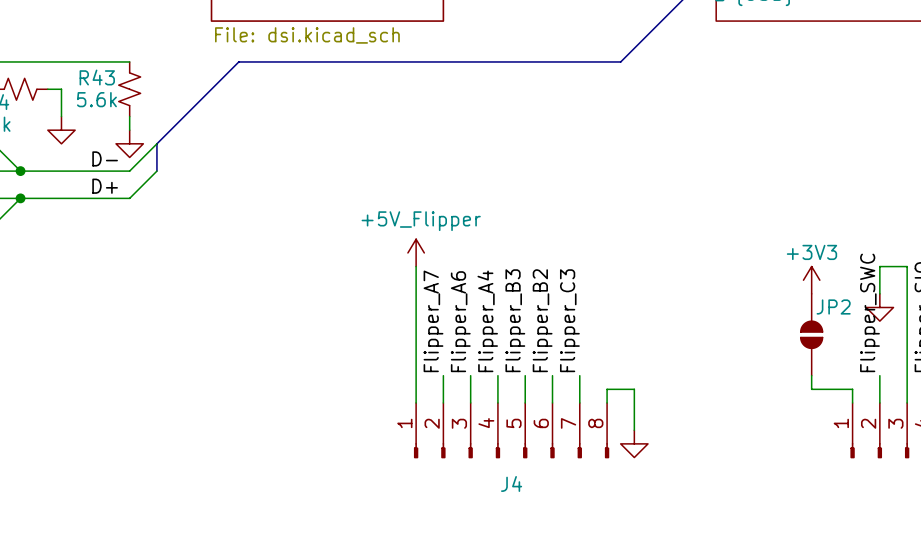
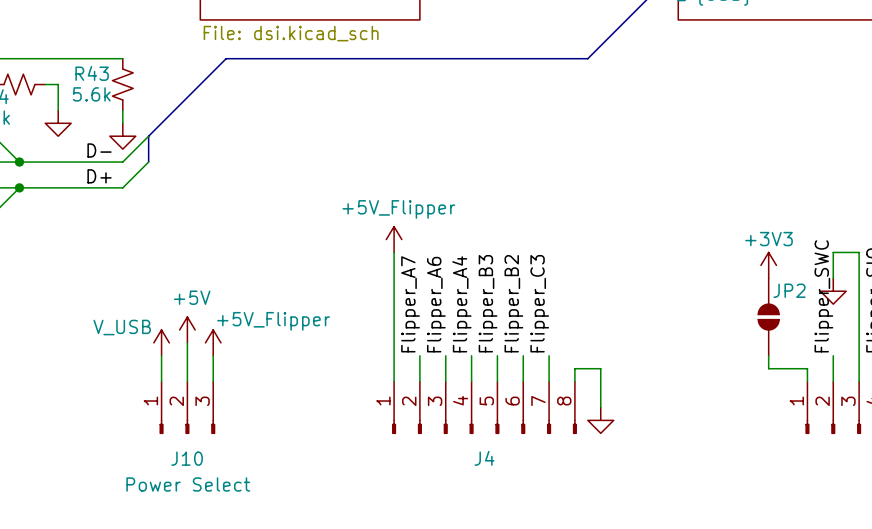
power symbol: none -> +5V (187, 329)
power symbol: none -> V_USB (161, 342)
wire: none -> (187, 342) (187, 381)
power symbol: none -> +5V_Flipper (213, 342)
wire: none -> (161, 355) (161, 381)
wire: none -> (213, 355) (213, 381)
J10: none -> Power Select (187, 407)

